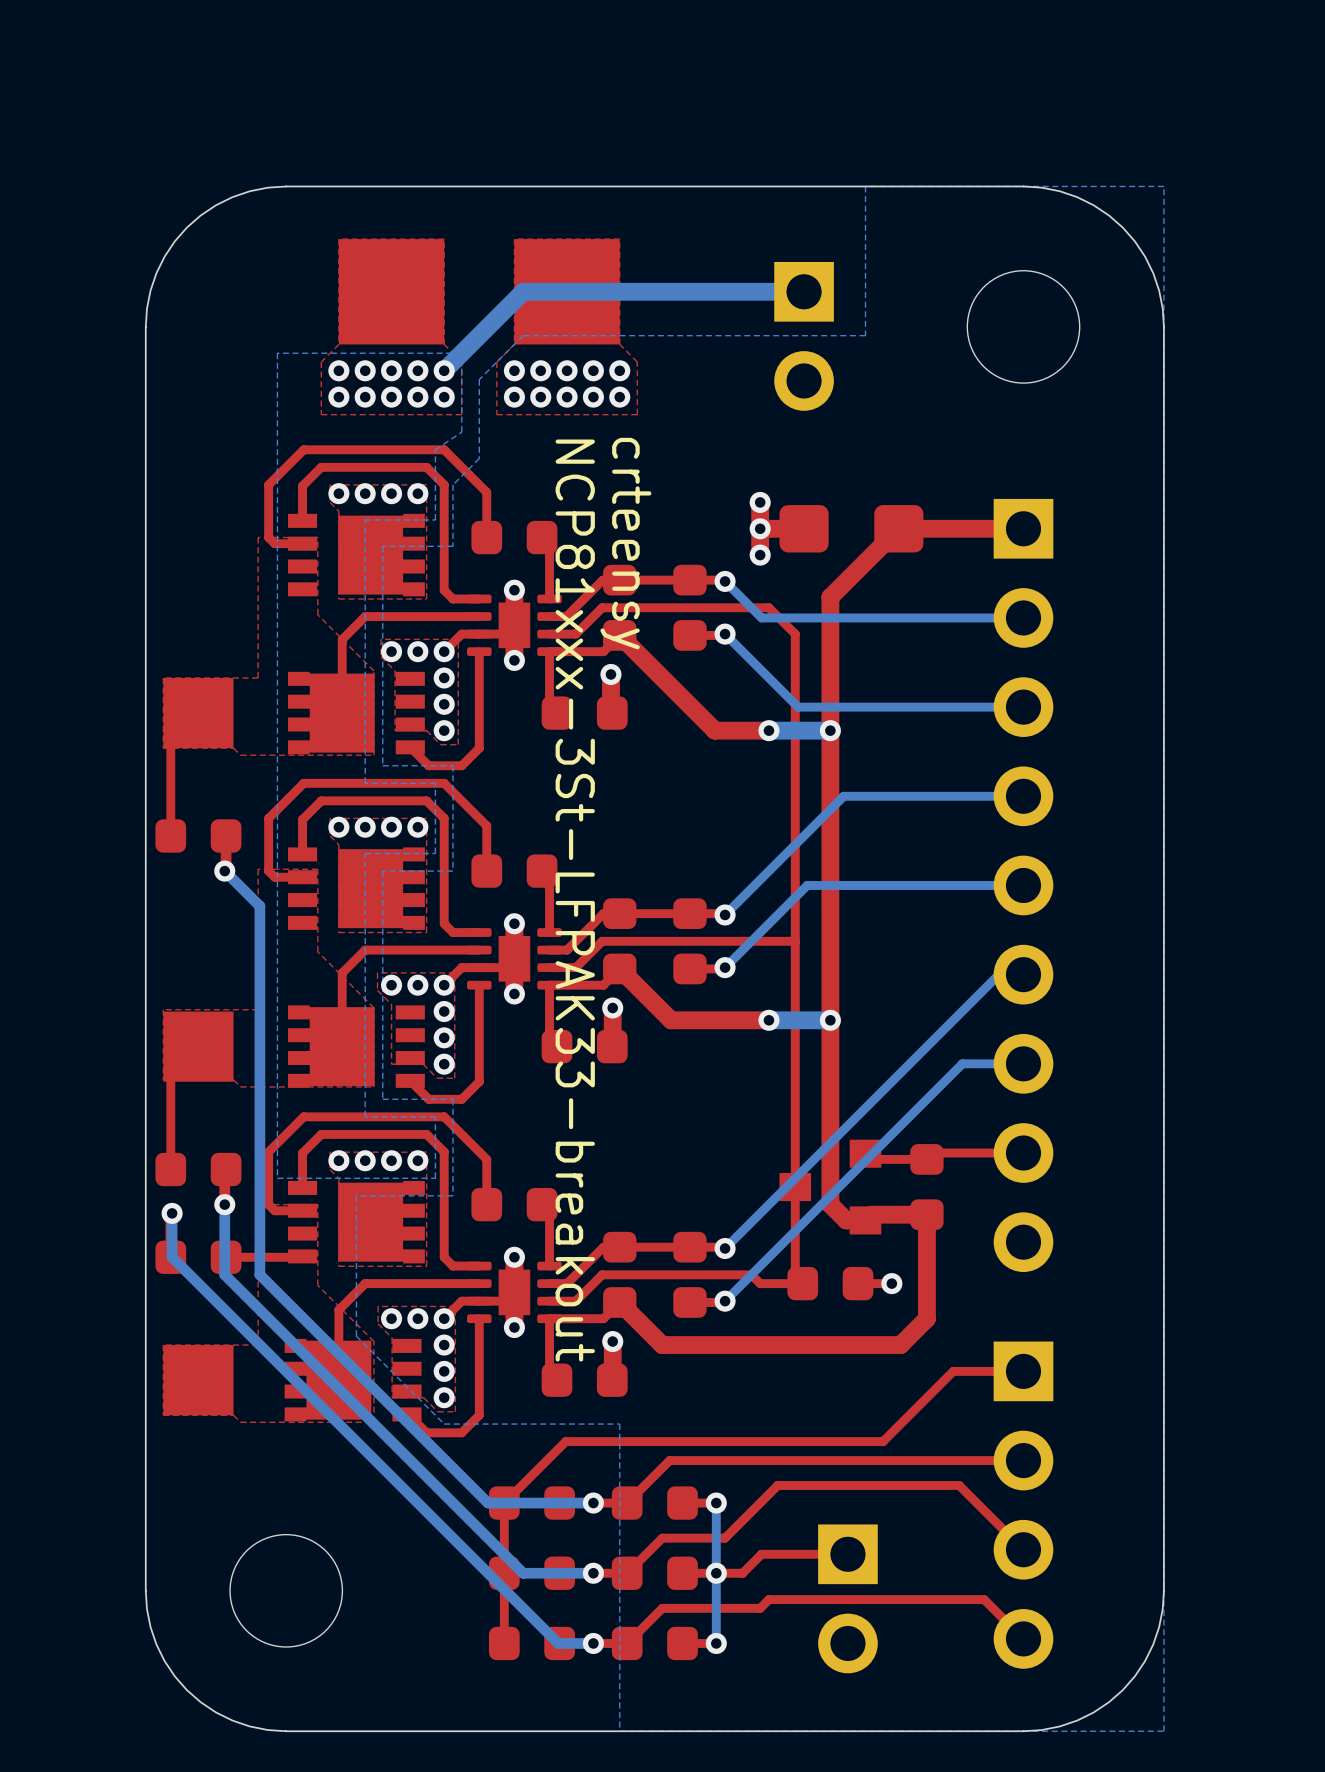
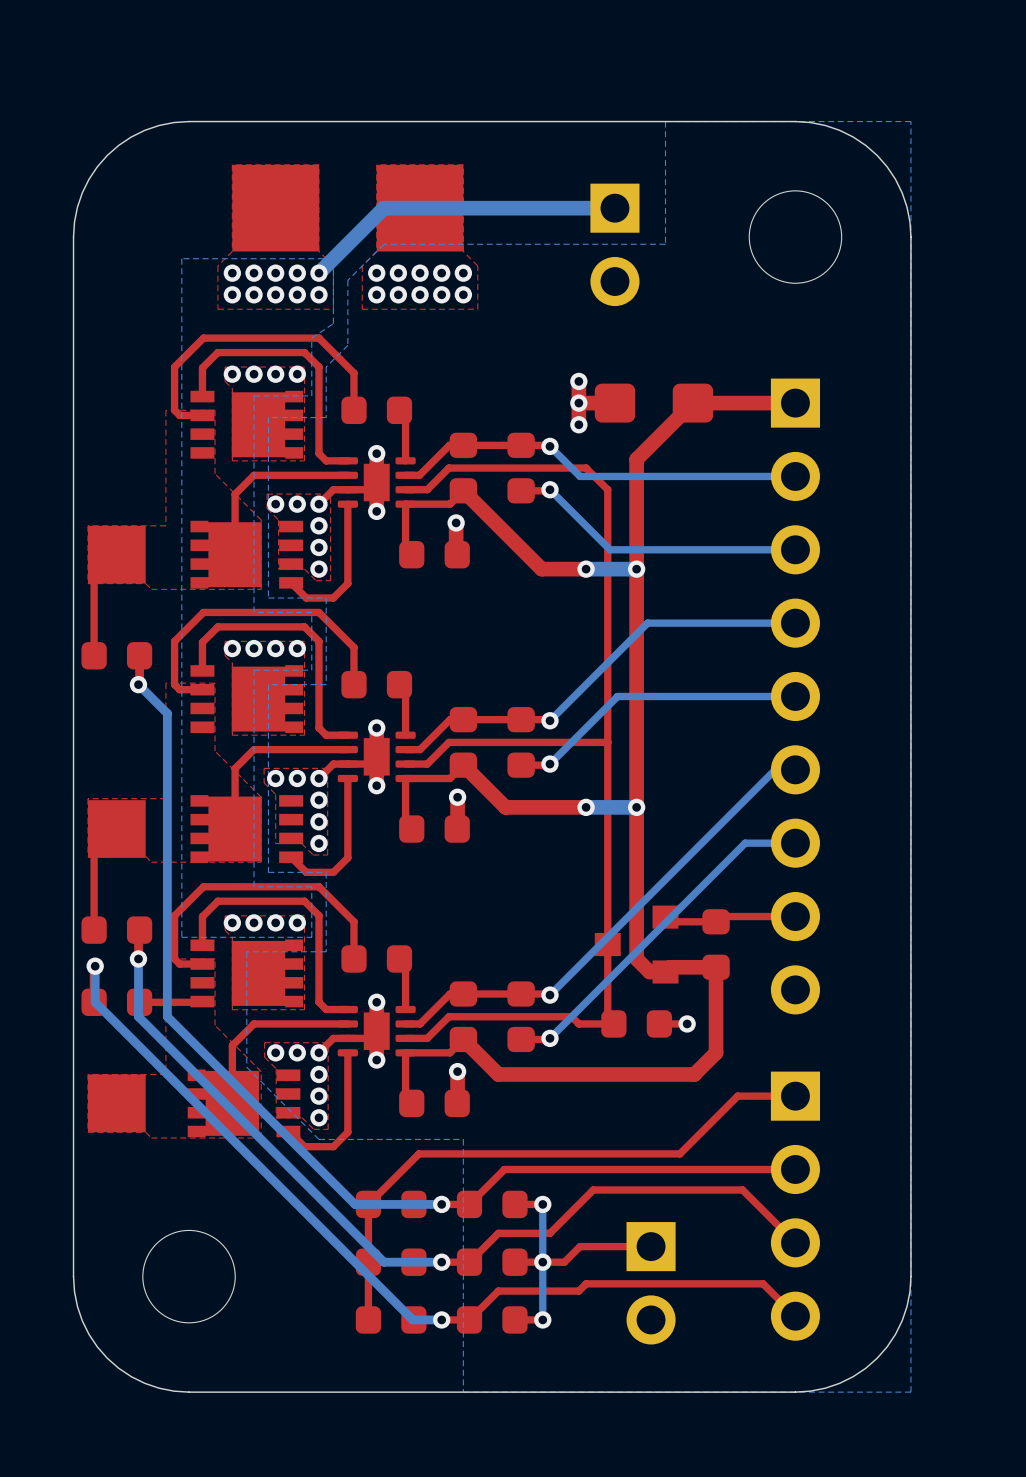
text: crteensy (625, 543) -> none
text: NCP81xxx-3St-LFPAK33-breakout (575, 900) -> none

